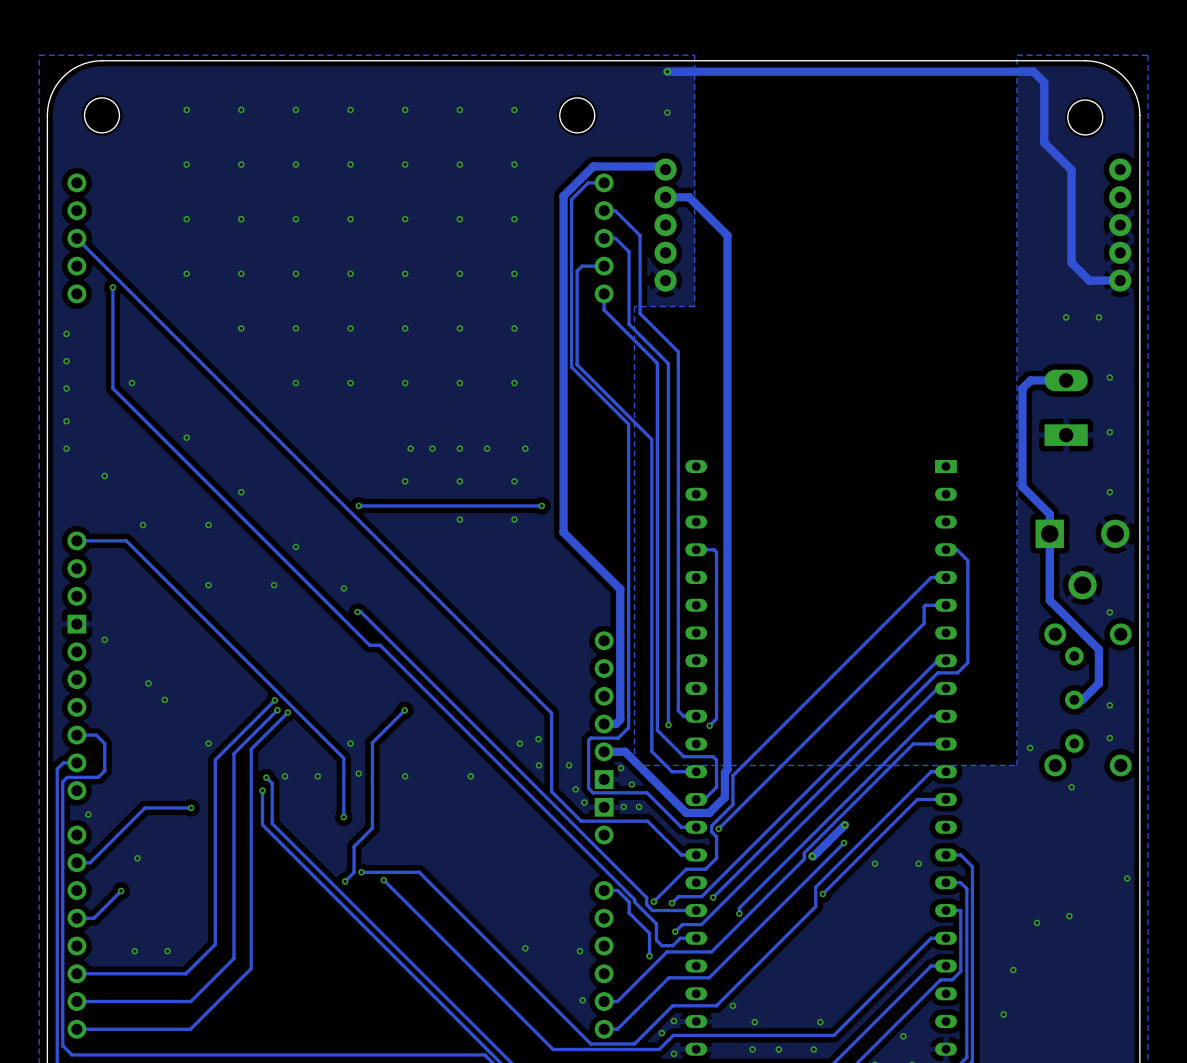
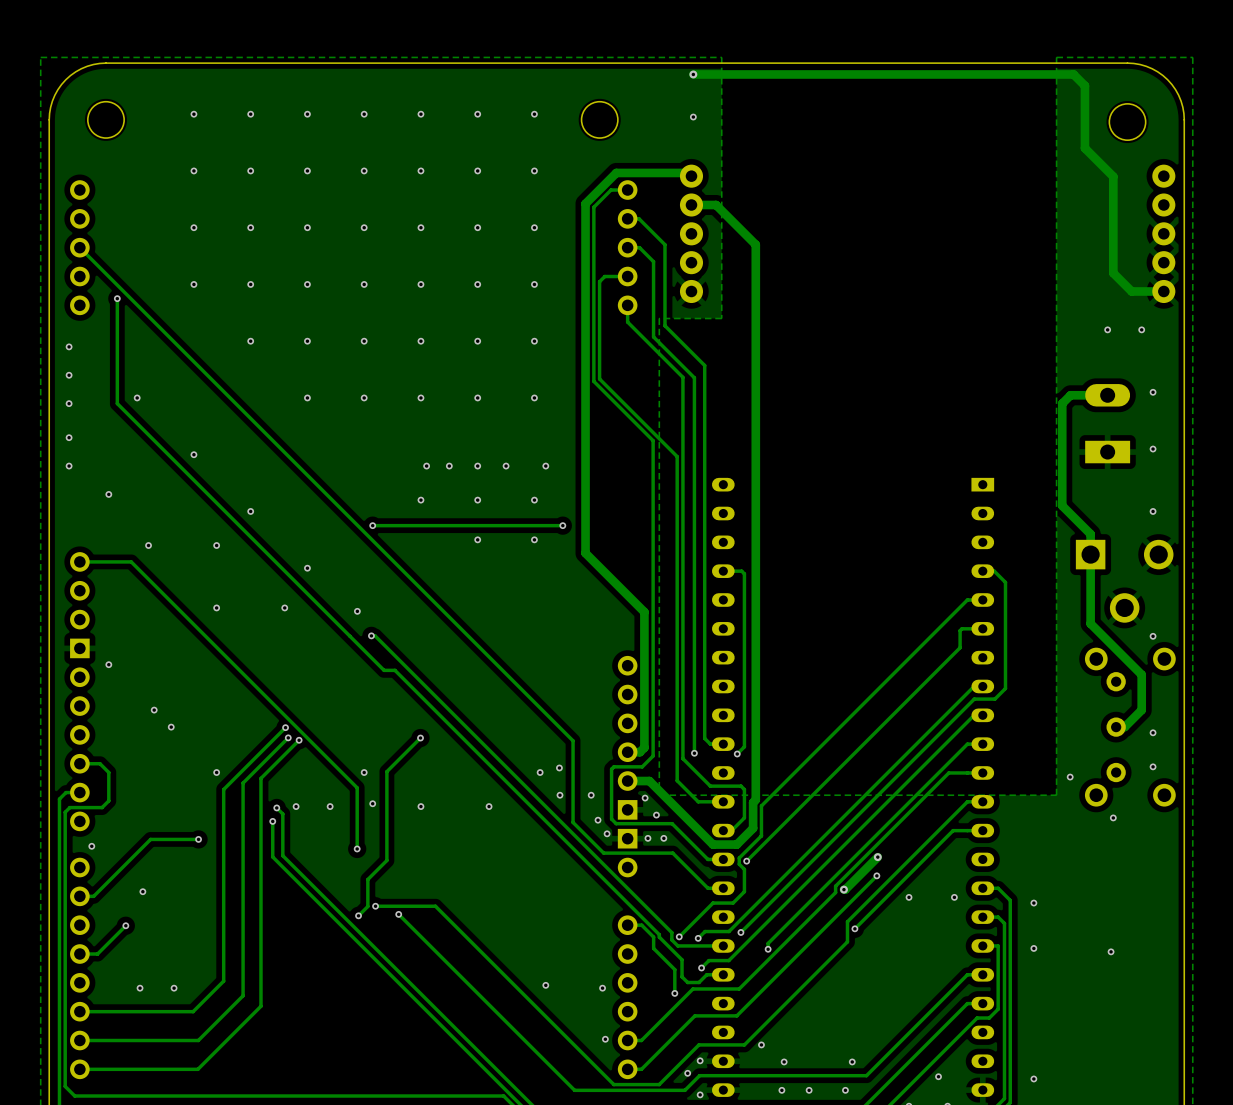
via: none -> (1033, 903)
via: (1127, 878) -> none
via: none -> (1033, 948)
via: (1036, 922) -> none
via: (1013, 970) -> none
via: (1003, 1014) -> none
via: none -> (1033, 1078)

